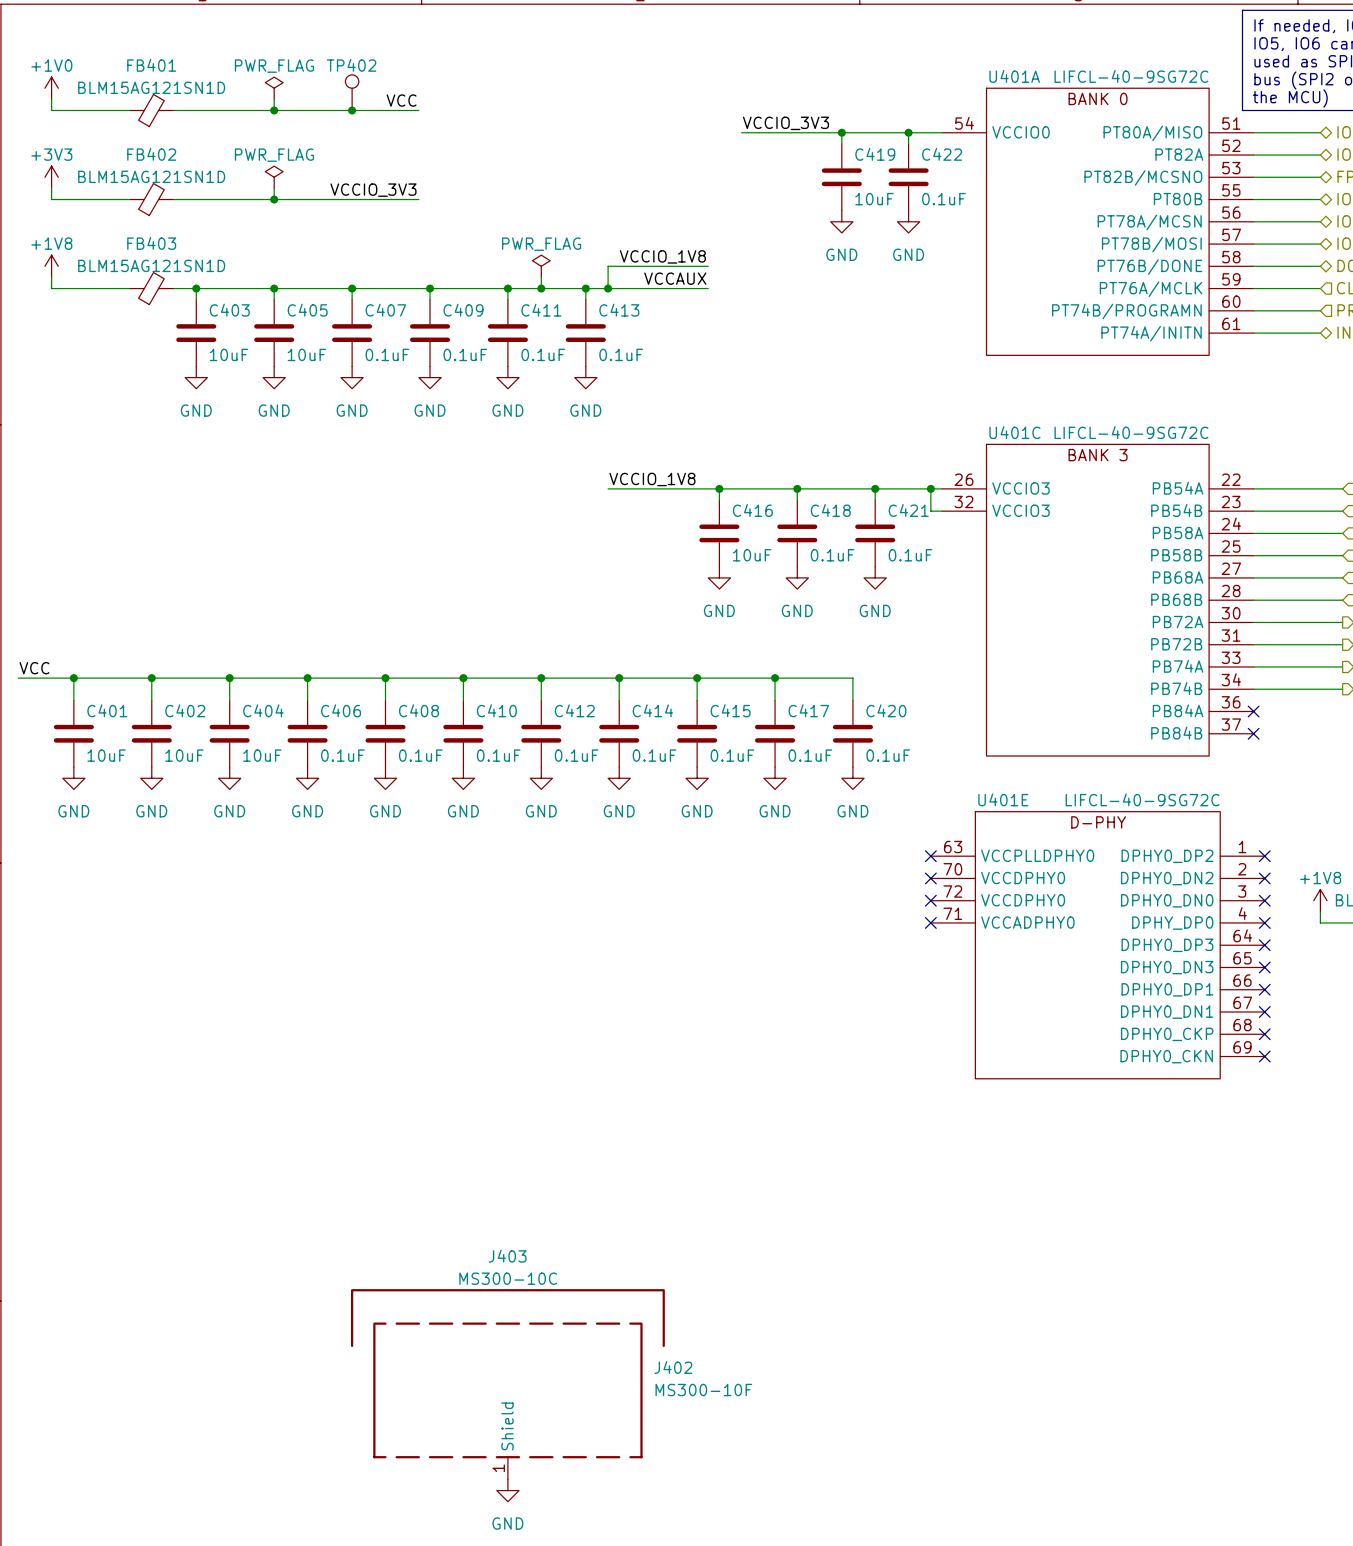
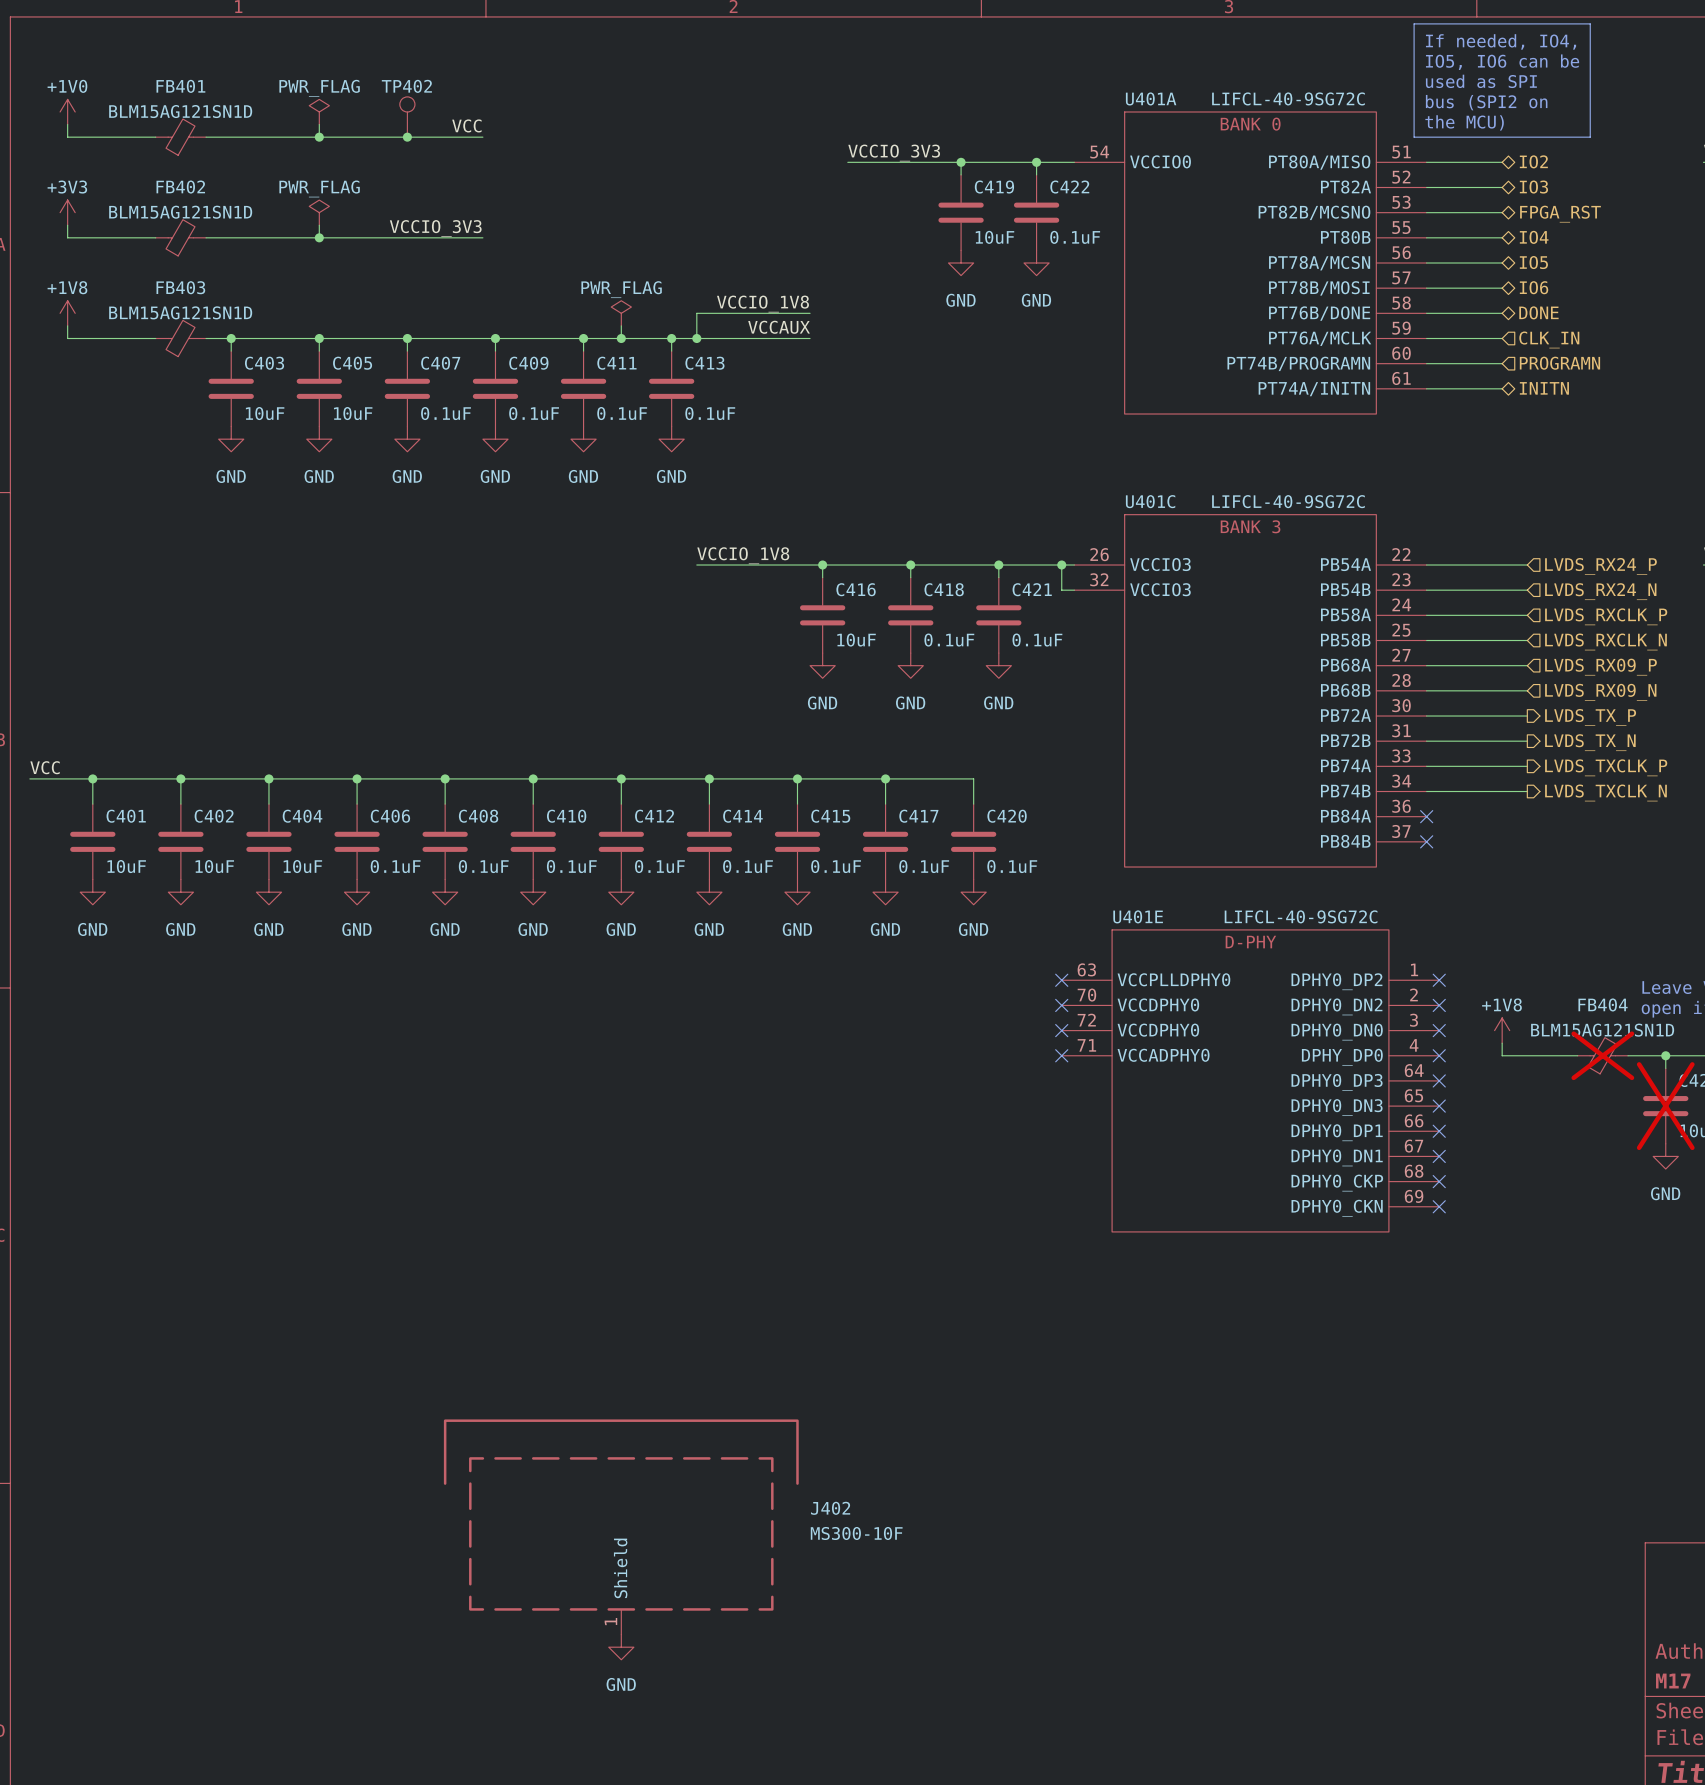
J403: MS300-10C (507, 1318) -> none
J402 symbol: [373, 1322, 643, 1480] -> [443, 1419, 799, 1635]
J402 name position: J402 (673, 1367) -> J402 (830, 1508)
J402 value position: MS300-10F (703, 1390) -> MS300-10F (856, 1533)
power symbol position: GND (507, 1490) -> GND (621, 1647)

